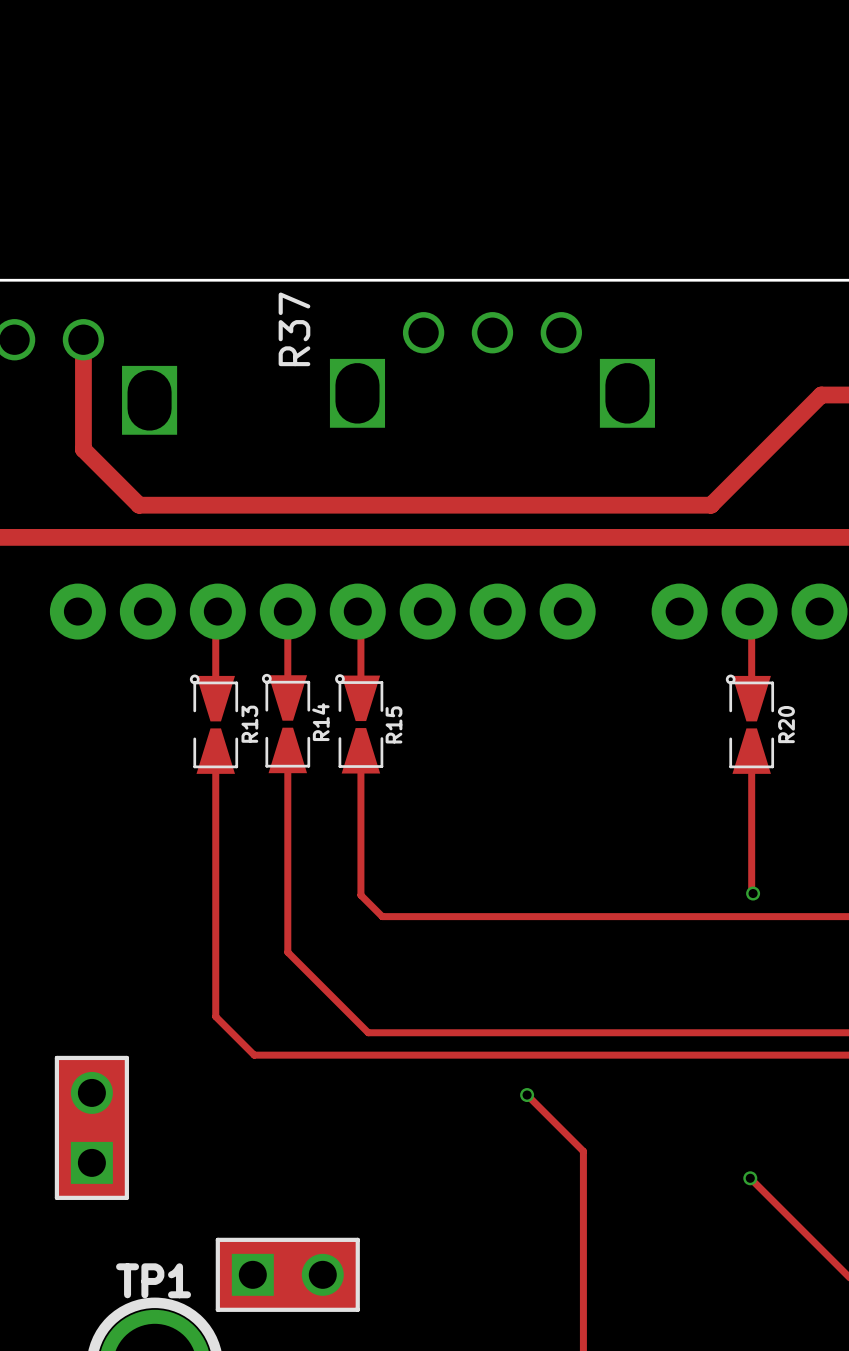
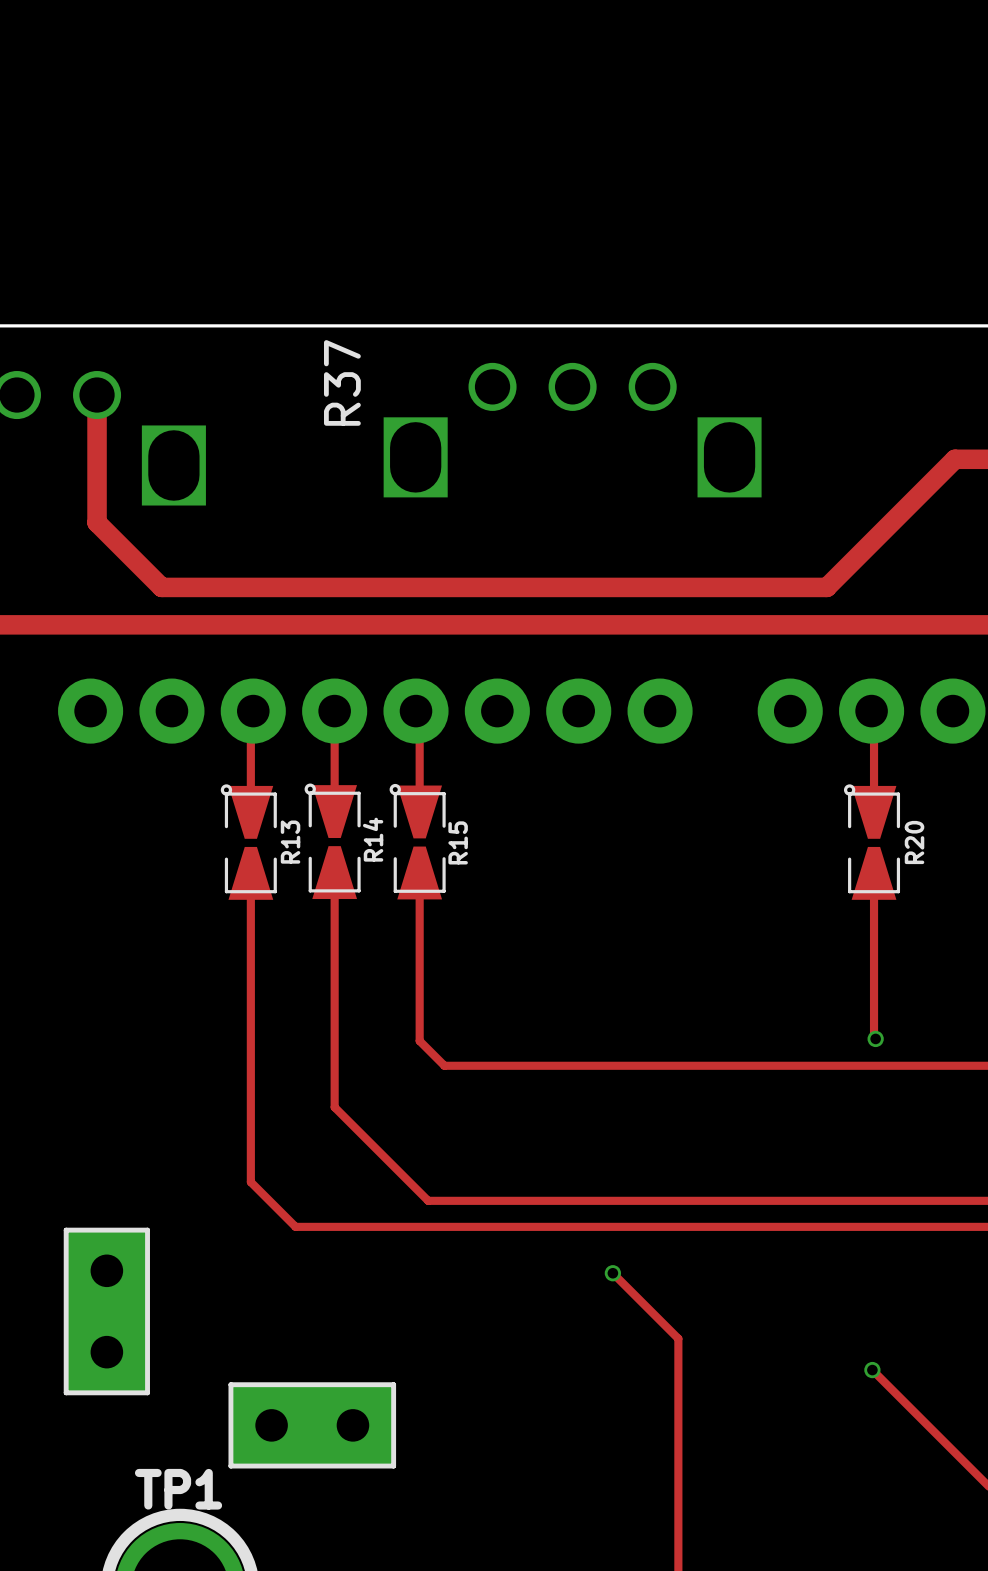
part footprint: [54, 1055, 129, 1200] -> [63, 1227, 150, 1396]
part: none -> (312, 1425)
part: (287, 1274) -> none

